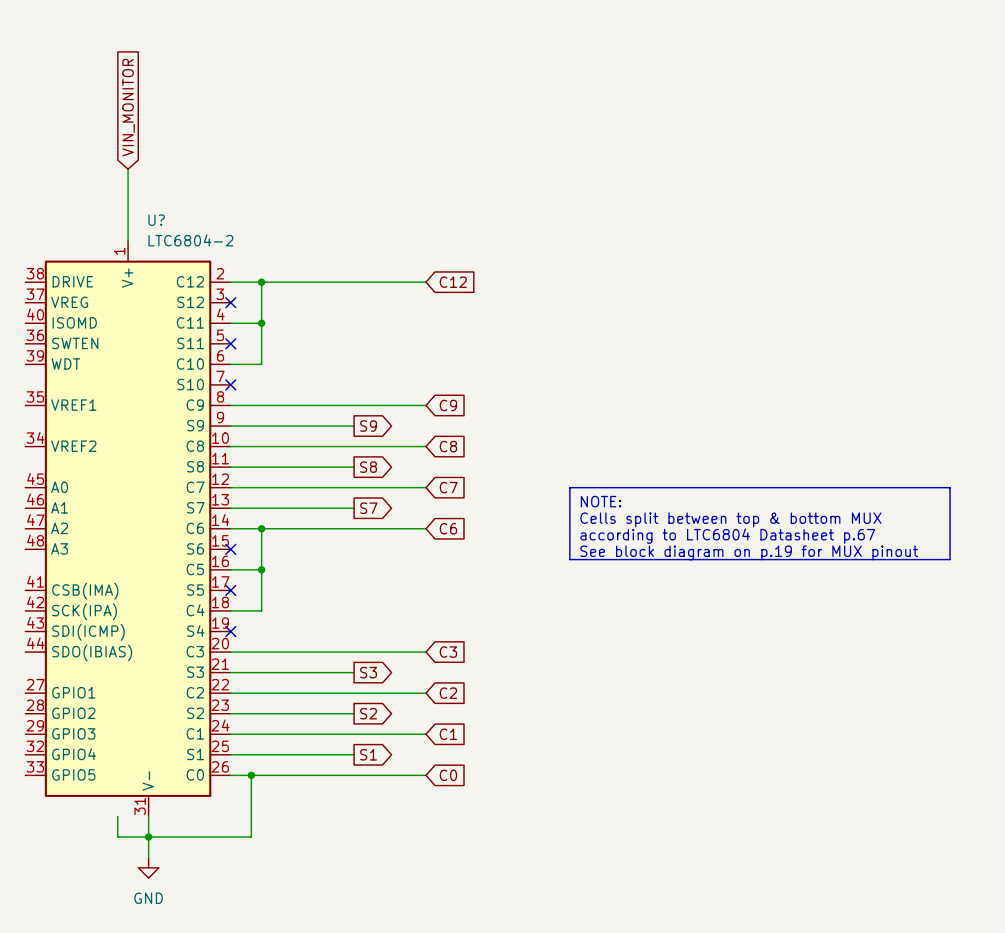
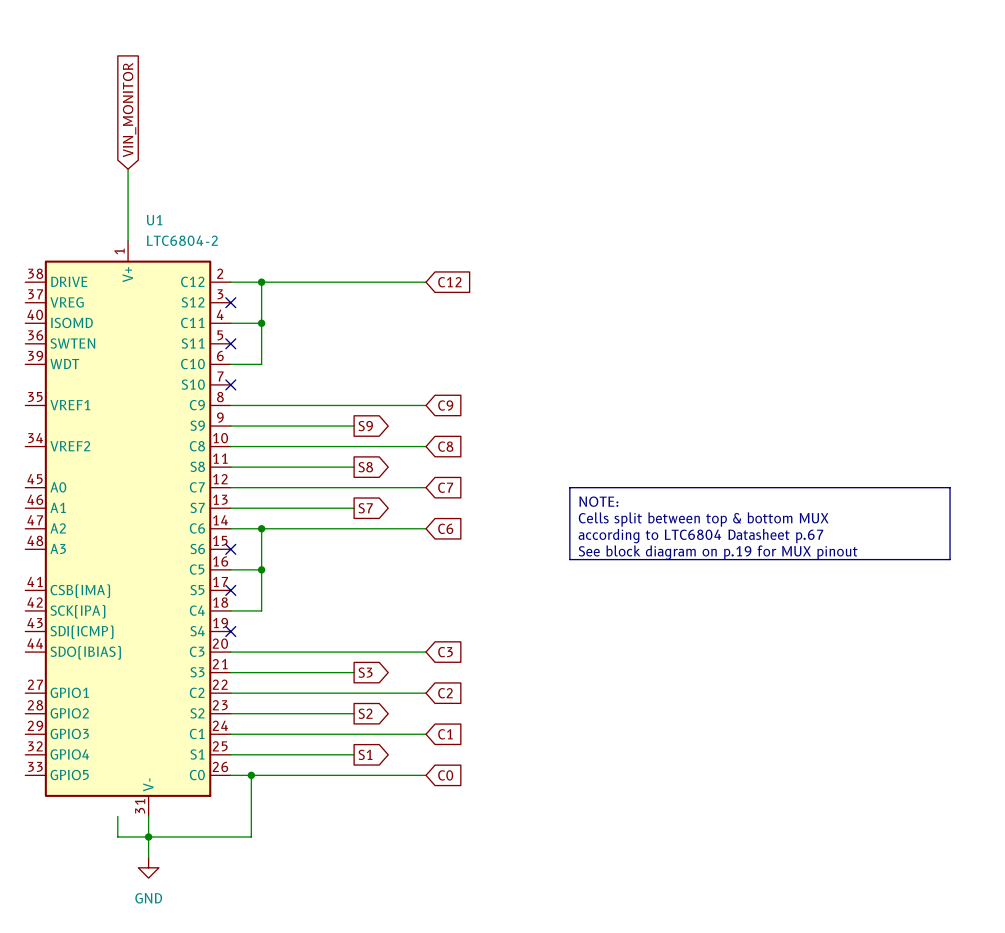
U? name: U? (156, 220) -> U1 (154, 220)

